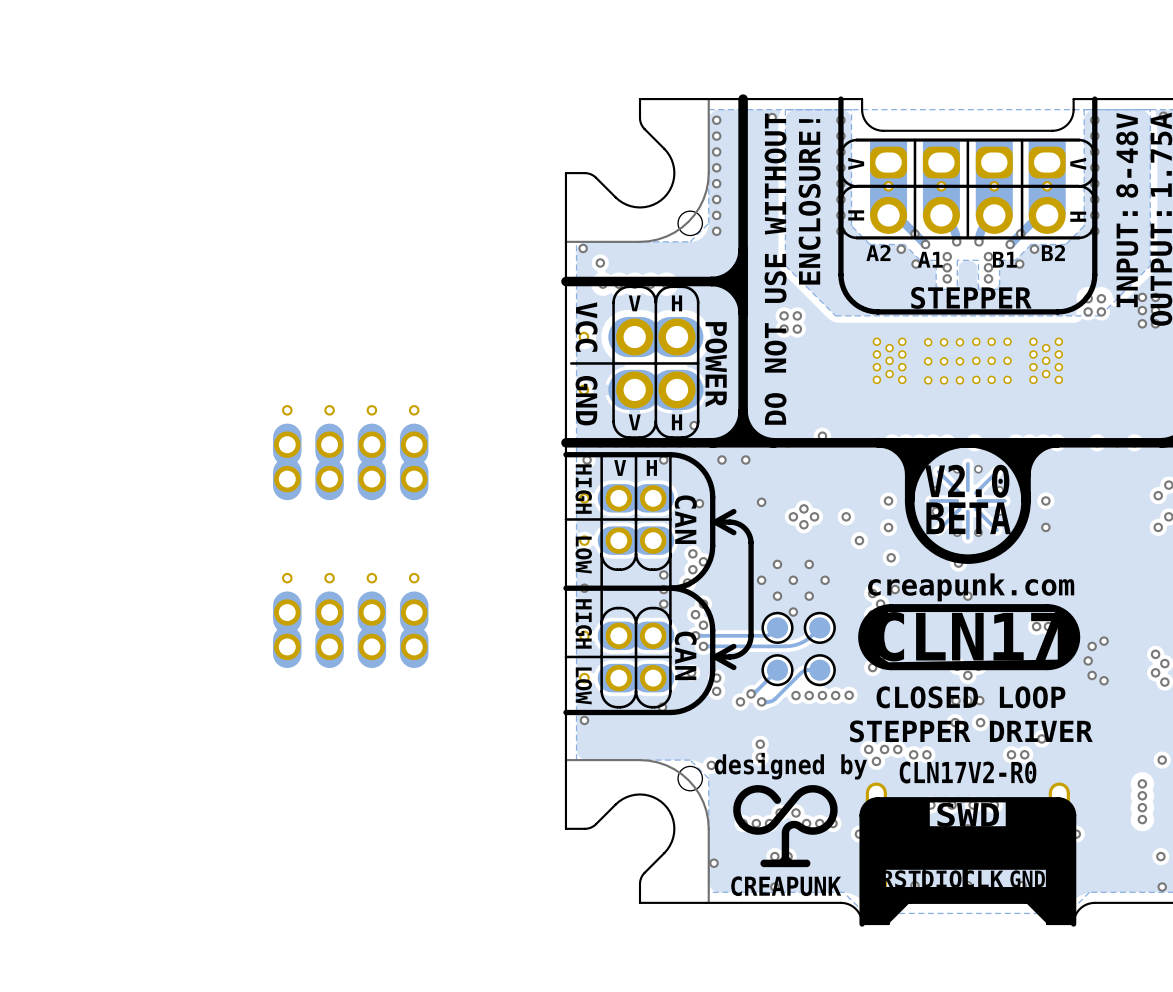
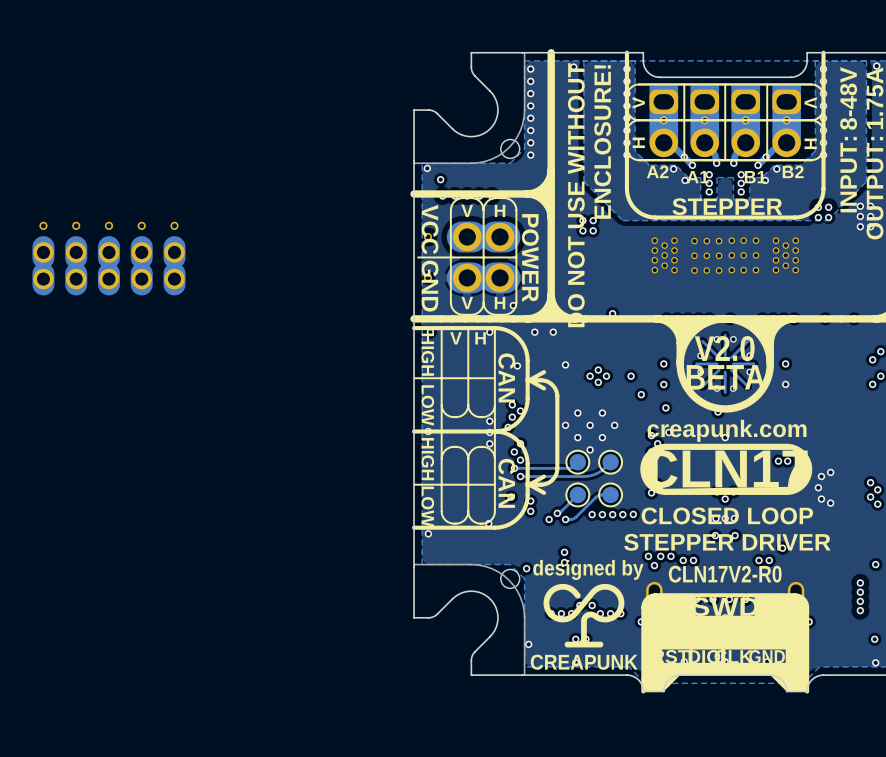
part: none -> (108, 258)
part: (350, 452) -> none
part: (626, 519) -> none
part: (350, 620) -> none
part: (626, 656) -> none

